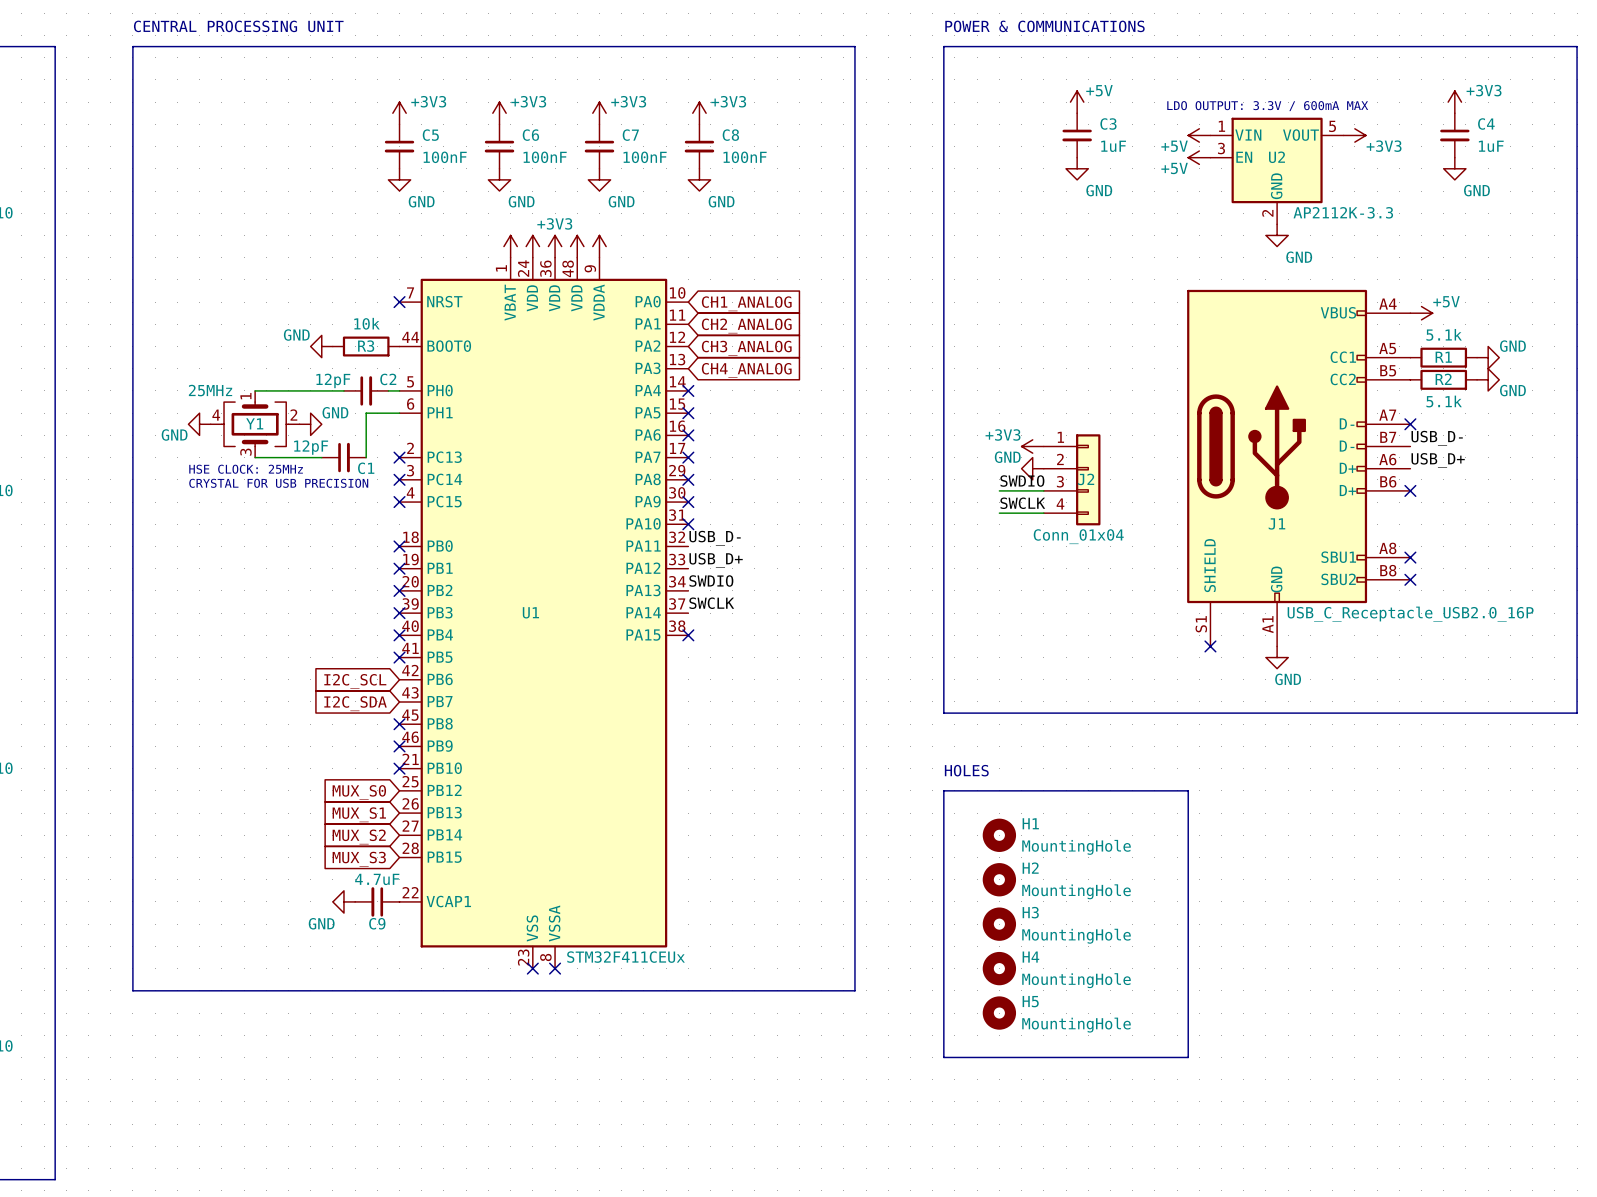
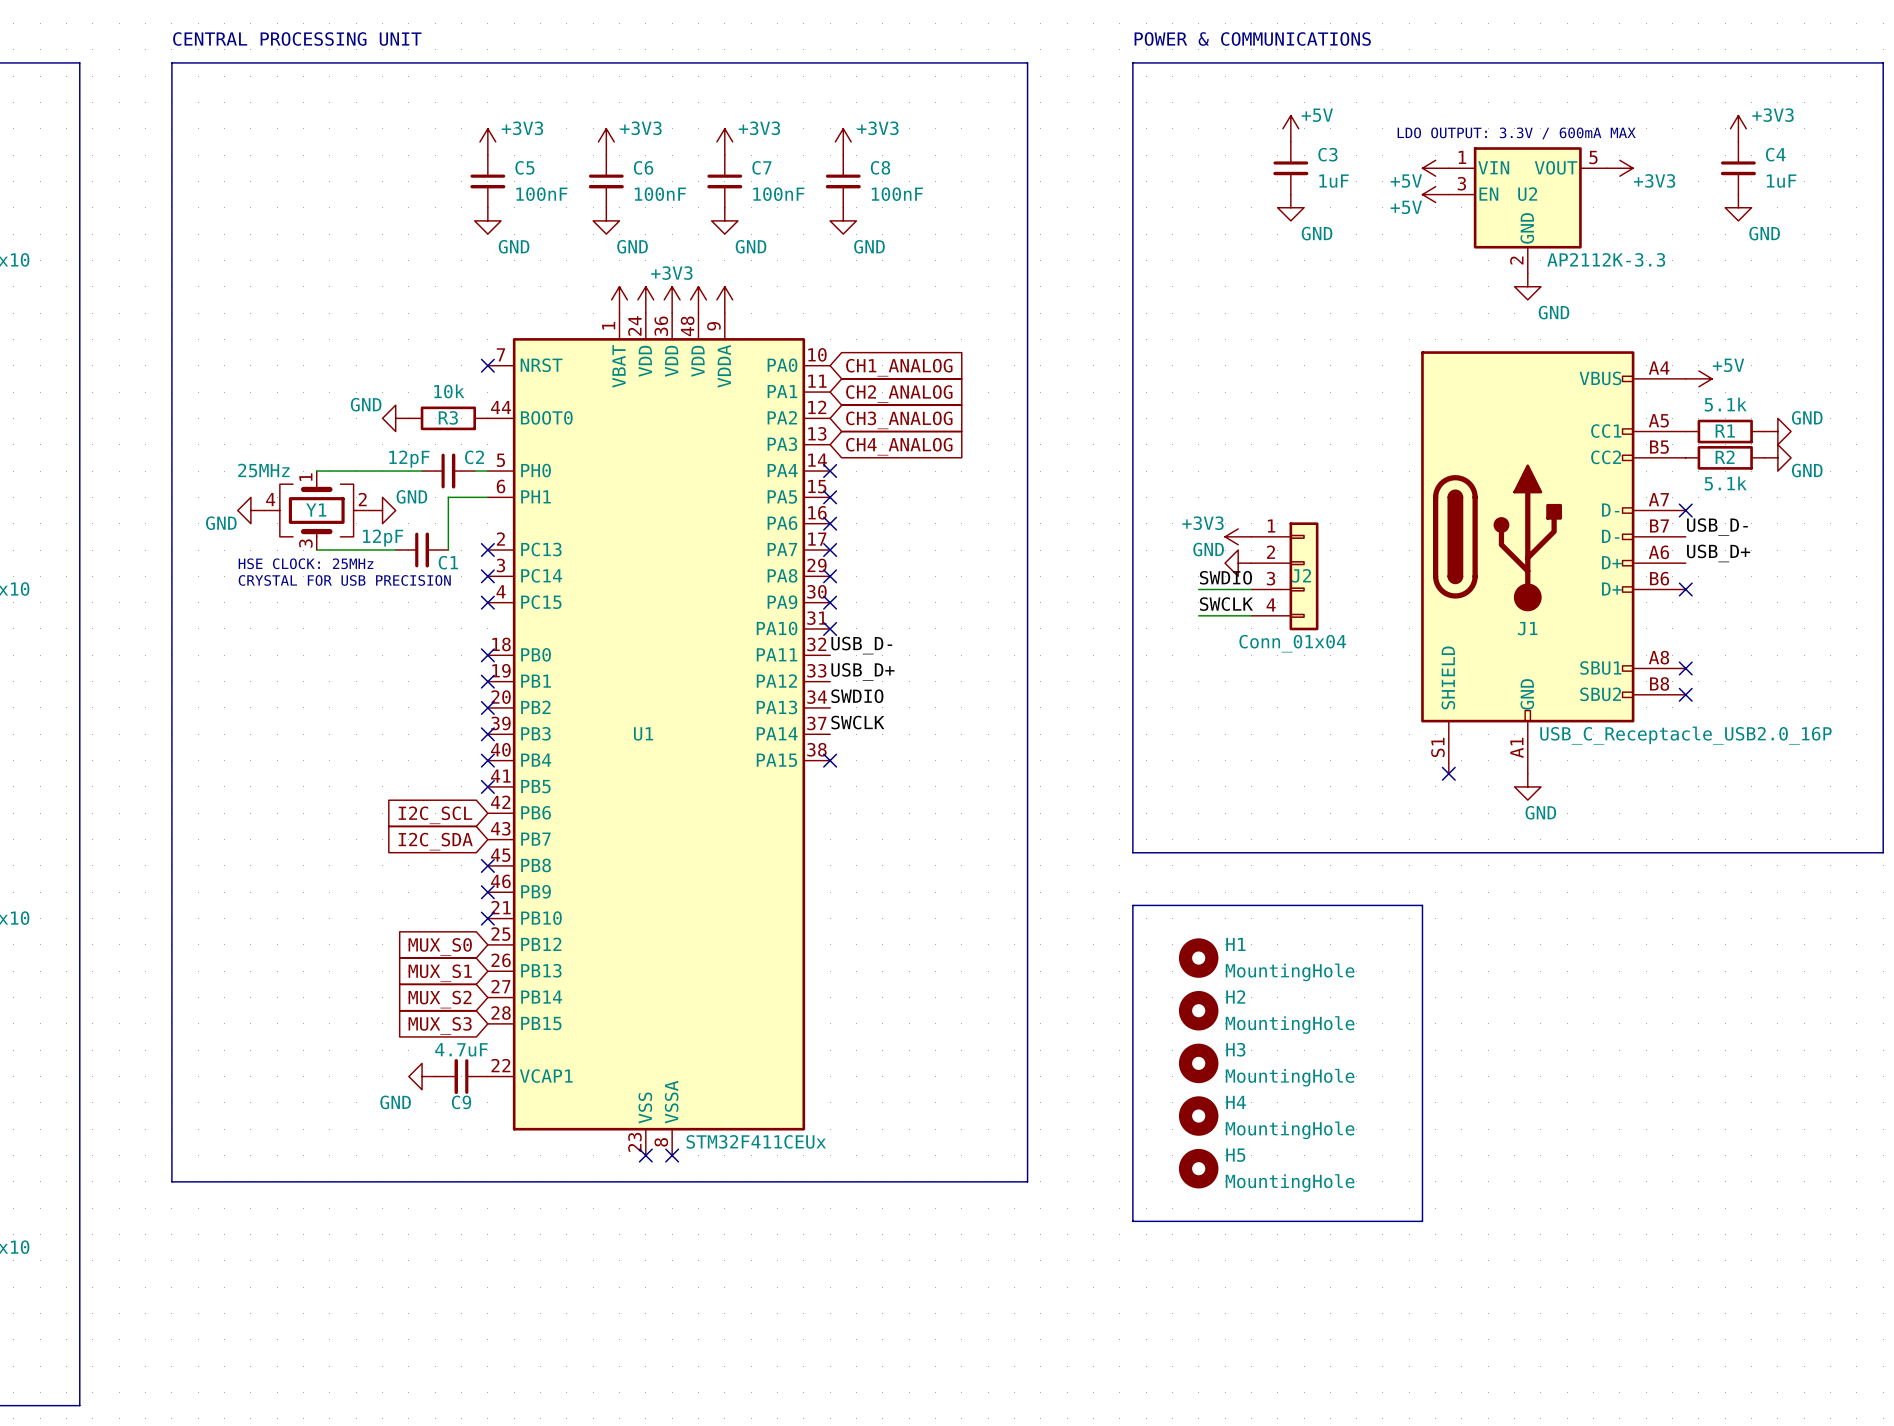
text: HOLES (966, 770) -> none
line: (943, 790) (1188, 790) -> (1132, 944) (1132, 905) (1422, 905) (1422, 944)
H1 position: (999, 835) -> (1198, 958)
H2 position: (999, 879) -> (1198, 1010)
H3 position: (999, 924) -> (1198, 1063)
H4 position: (999, 968) -> (1198, 1116)
H5 position: (999, 1013) -> (1198, 1168)
line: (943, 1024) (943, 1057) (1188, 1057) (1188, 1024) -> (1132, 1221) (1422, 1221)

